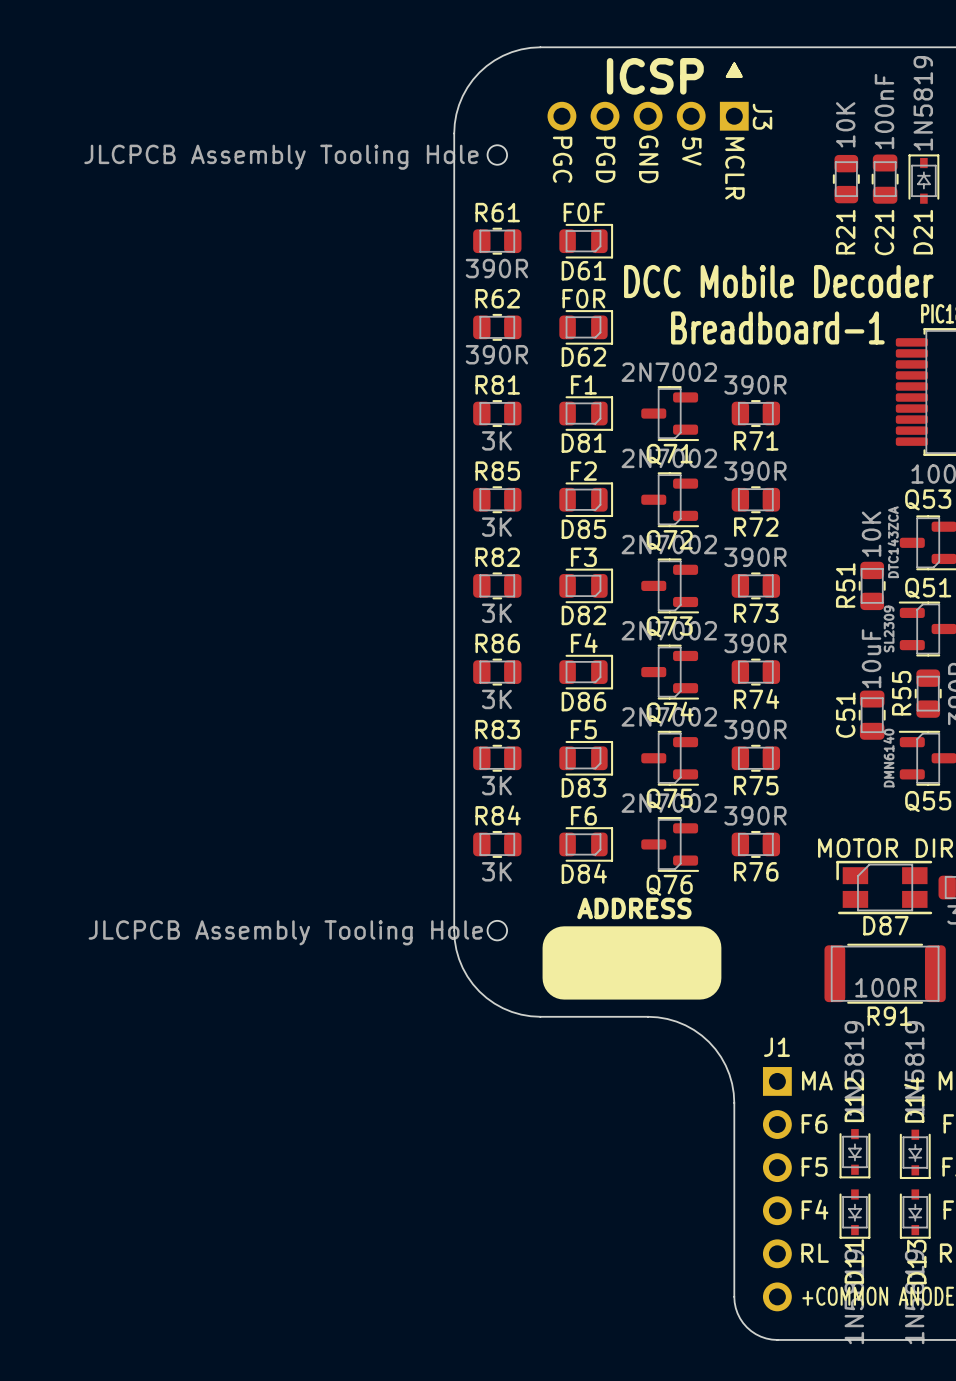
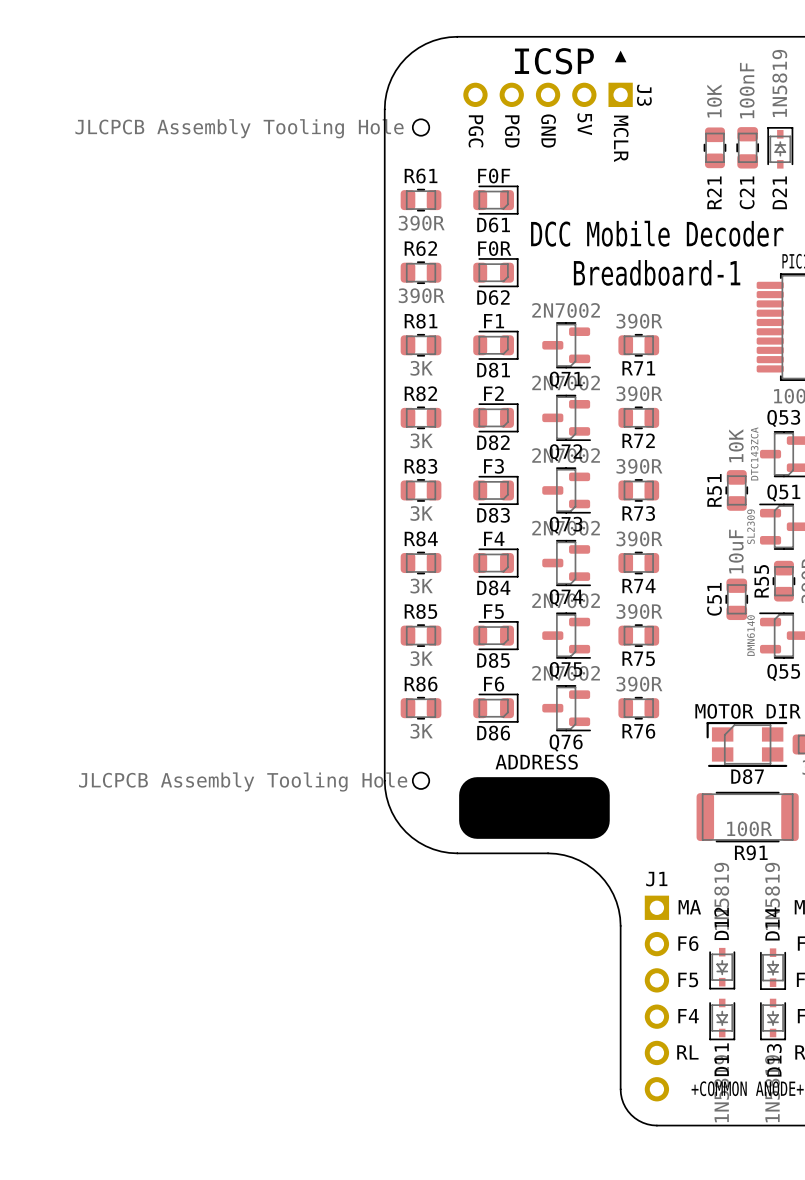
R85 name: R85 (497, 471) -> R82 (420, 393)
D85 name: D85 (583, 529) -> D82 (493, 442)
R82 name: R82 (497, 557) -> R83 (420, 466)
D82 name: D82 (583, 615) -> D83 (493, 515)
R86 name: R86 (497, 643) -> R84 (421, 538)
D86 name: D86 (583, 701) -> D84 (493, 587)
R83 name: R83 (497, 729) -> R85 (420, 611)
D83 name: D83 (583, 787) -> D85 (493, 660)
R84 name: R84 (498, 815) -> R86 (421, 684)
D84 name: D84 (584, 873) -> D86 (493, 733)

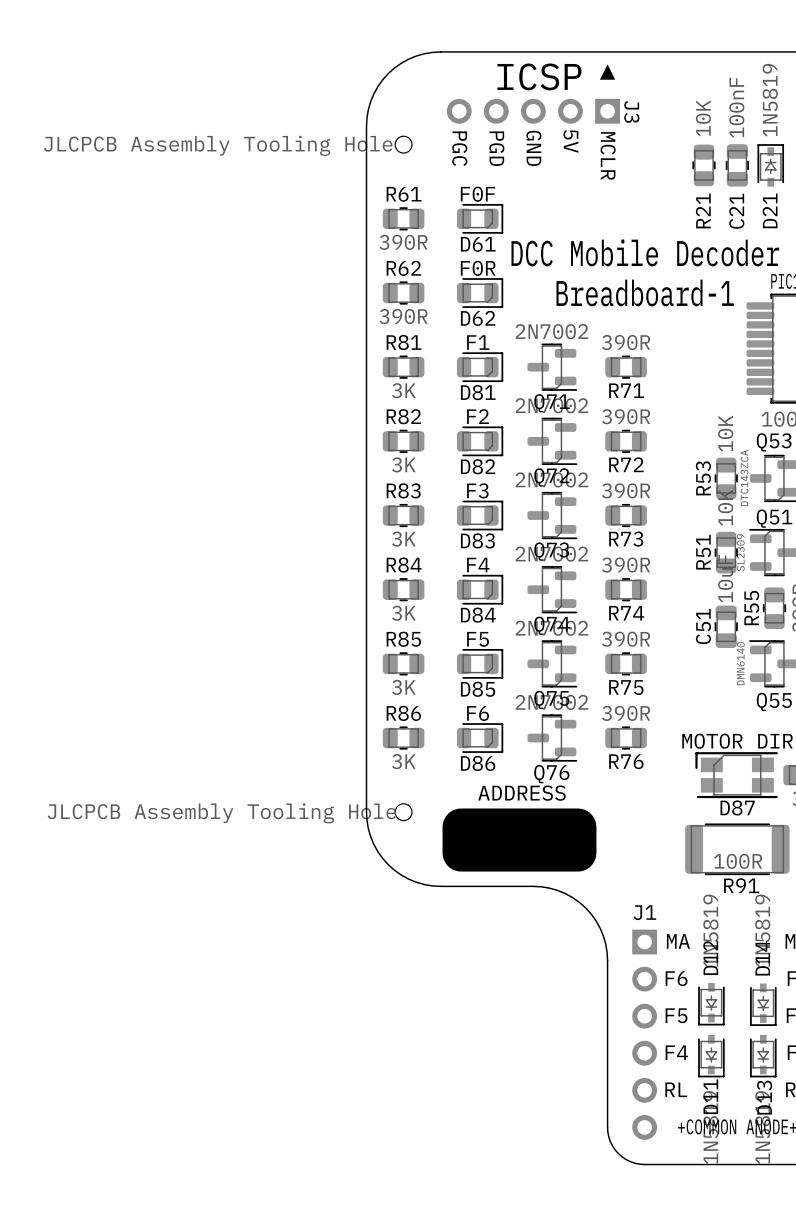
R53: none -> 10K (726, 478)
R51 position: (736, 490) -> (726, 552)

